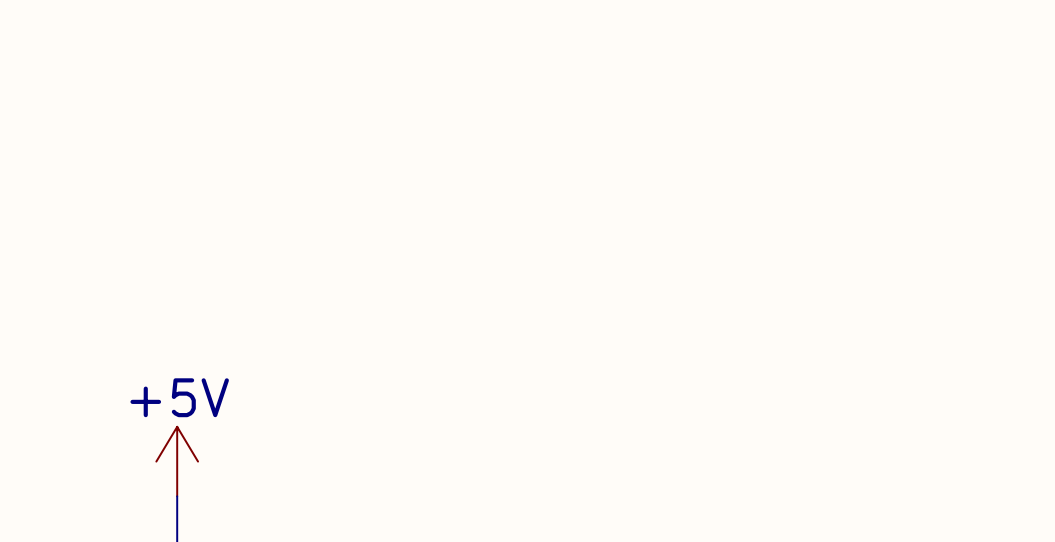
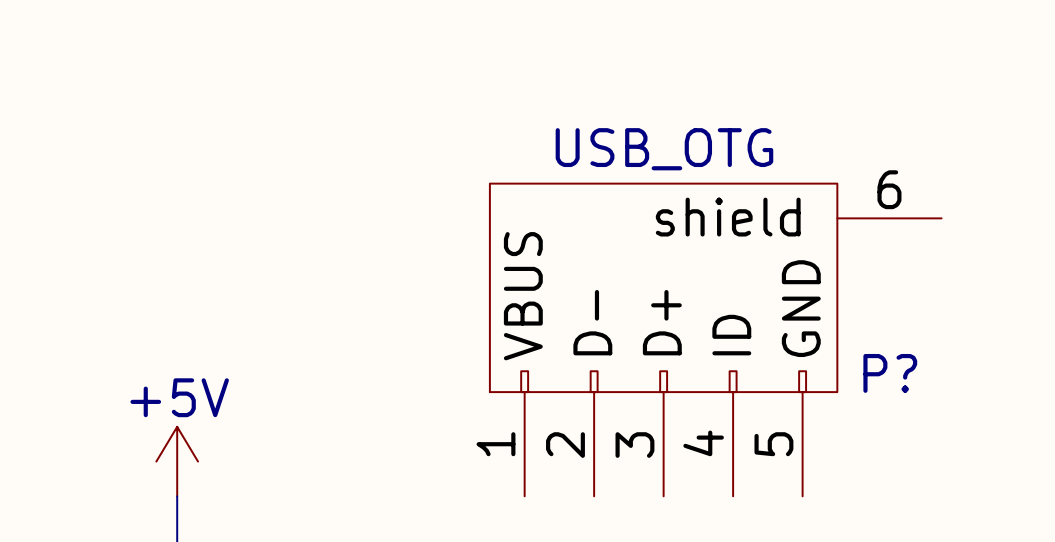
P?: none -> USB_OTG (715, 339)

